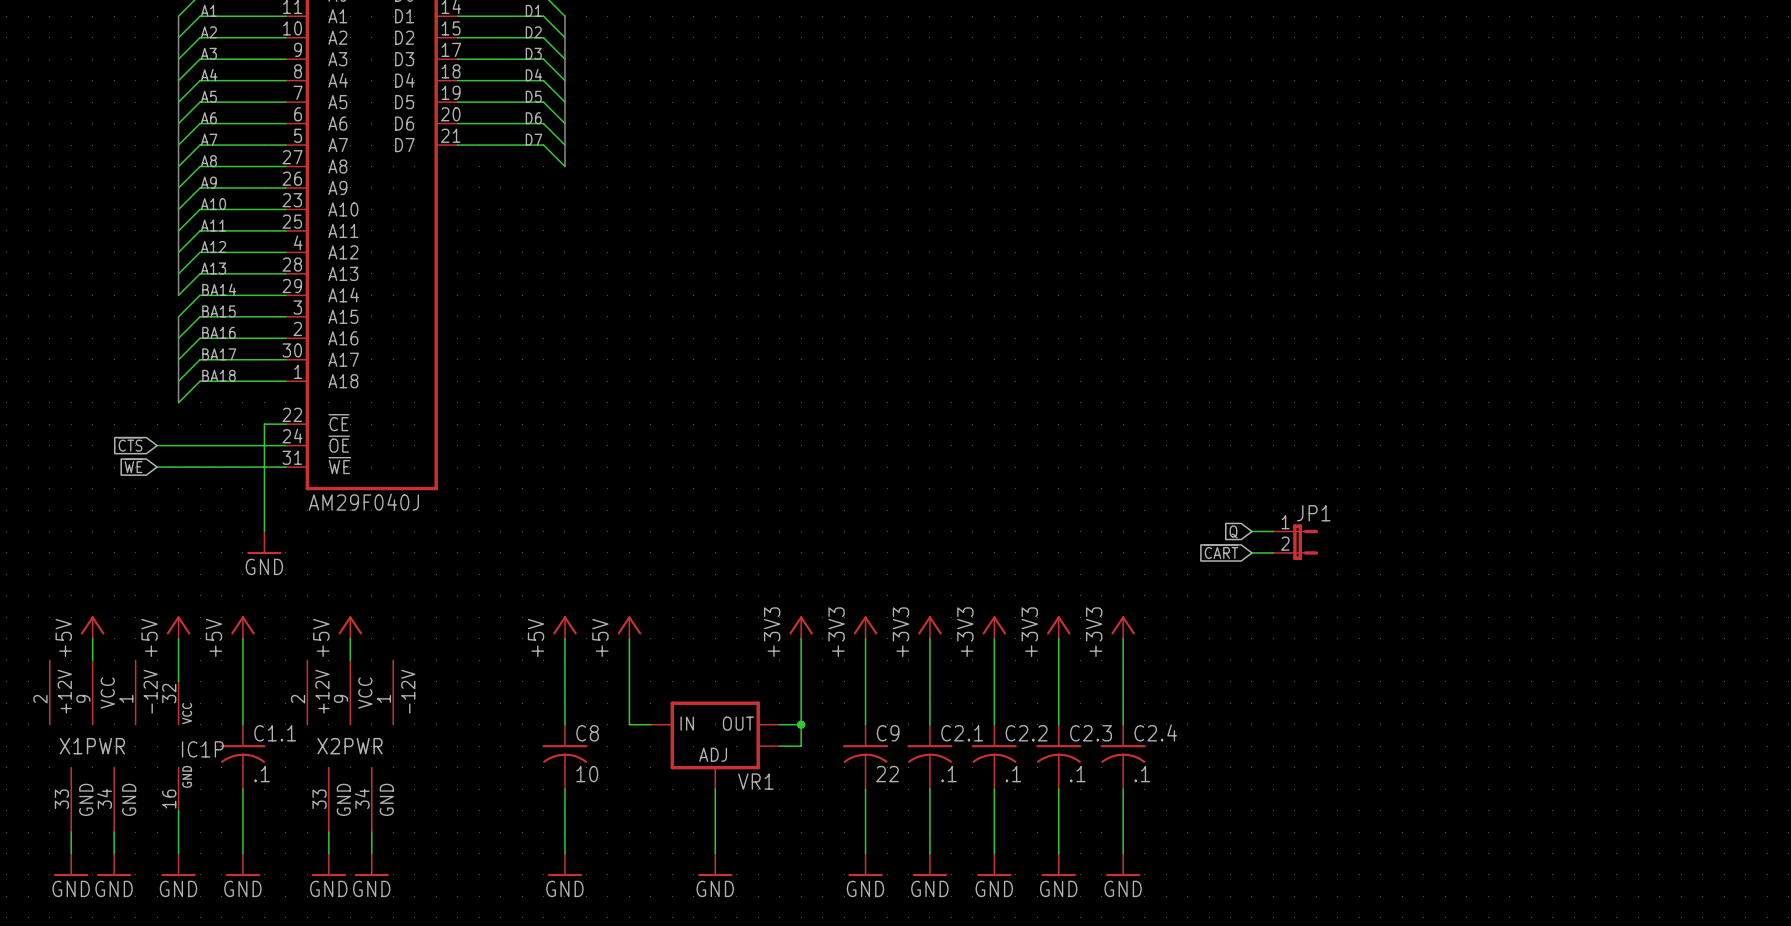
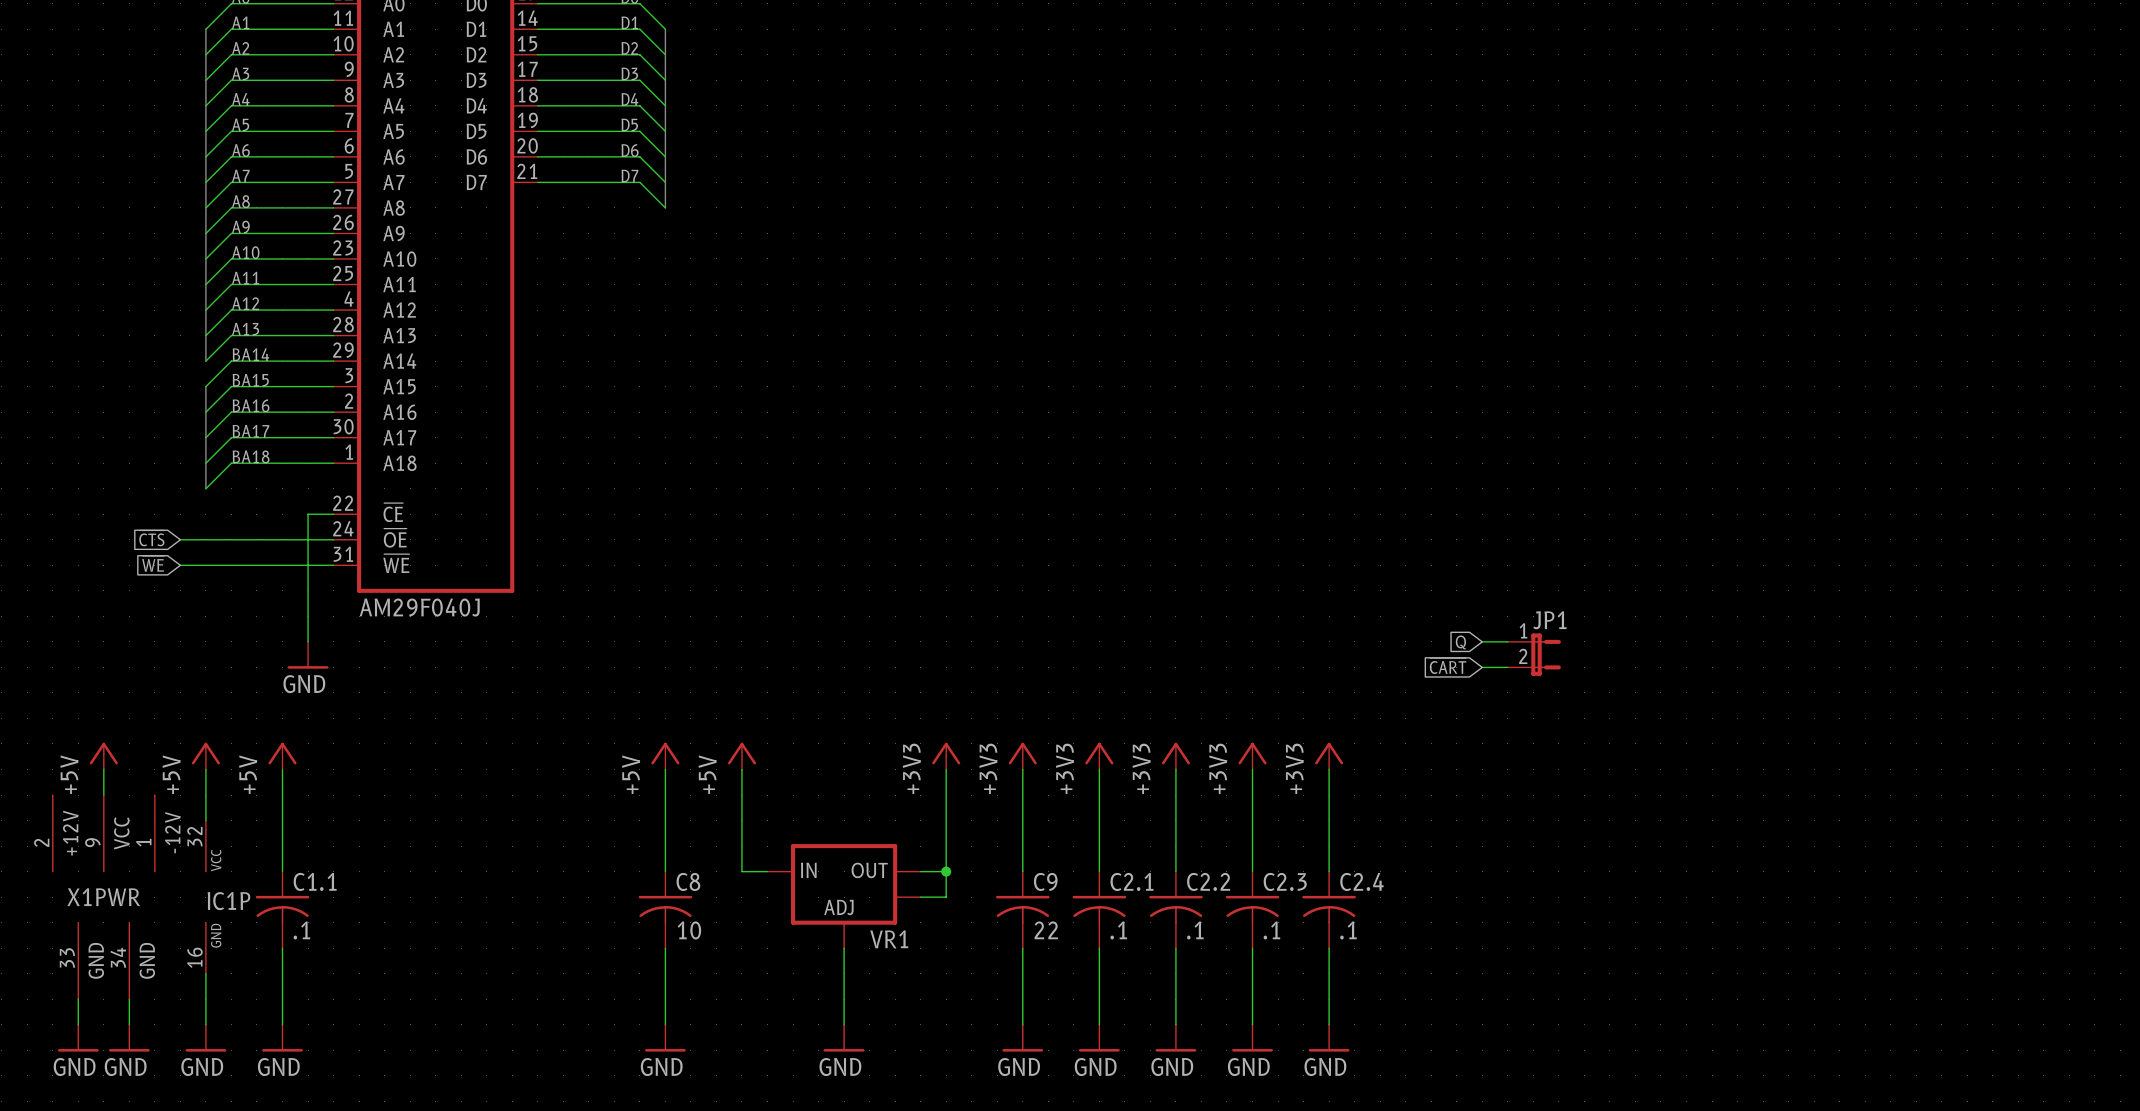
power symbol: +5V (350, 627) -> none
wire: (350, 638) (350, 660) -> none
X2PWR: (350, 746) -> none
wire: (328, 832) (328, 853) -> none
wire: (371, 832) (371, 853) -> none
power symbol: GND (328, 864) -> none
power symbol: GND (371, 864) -> none

